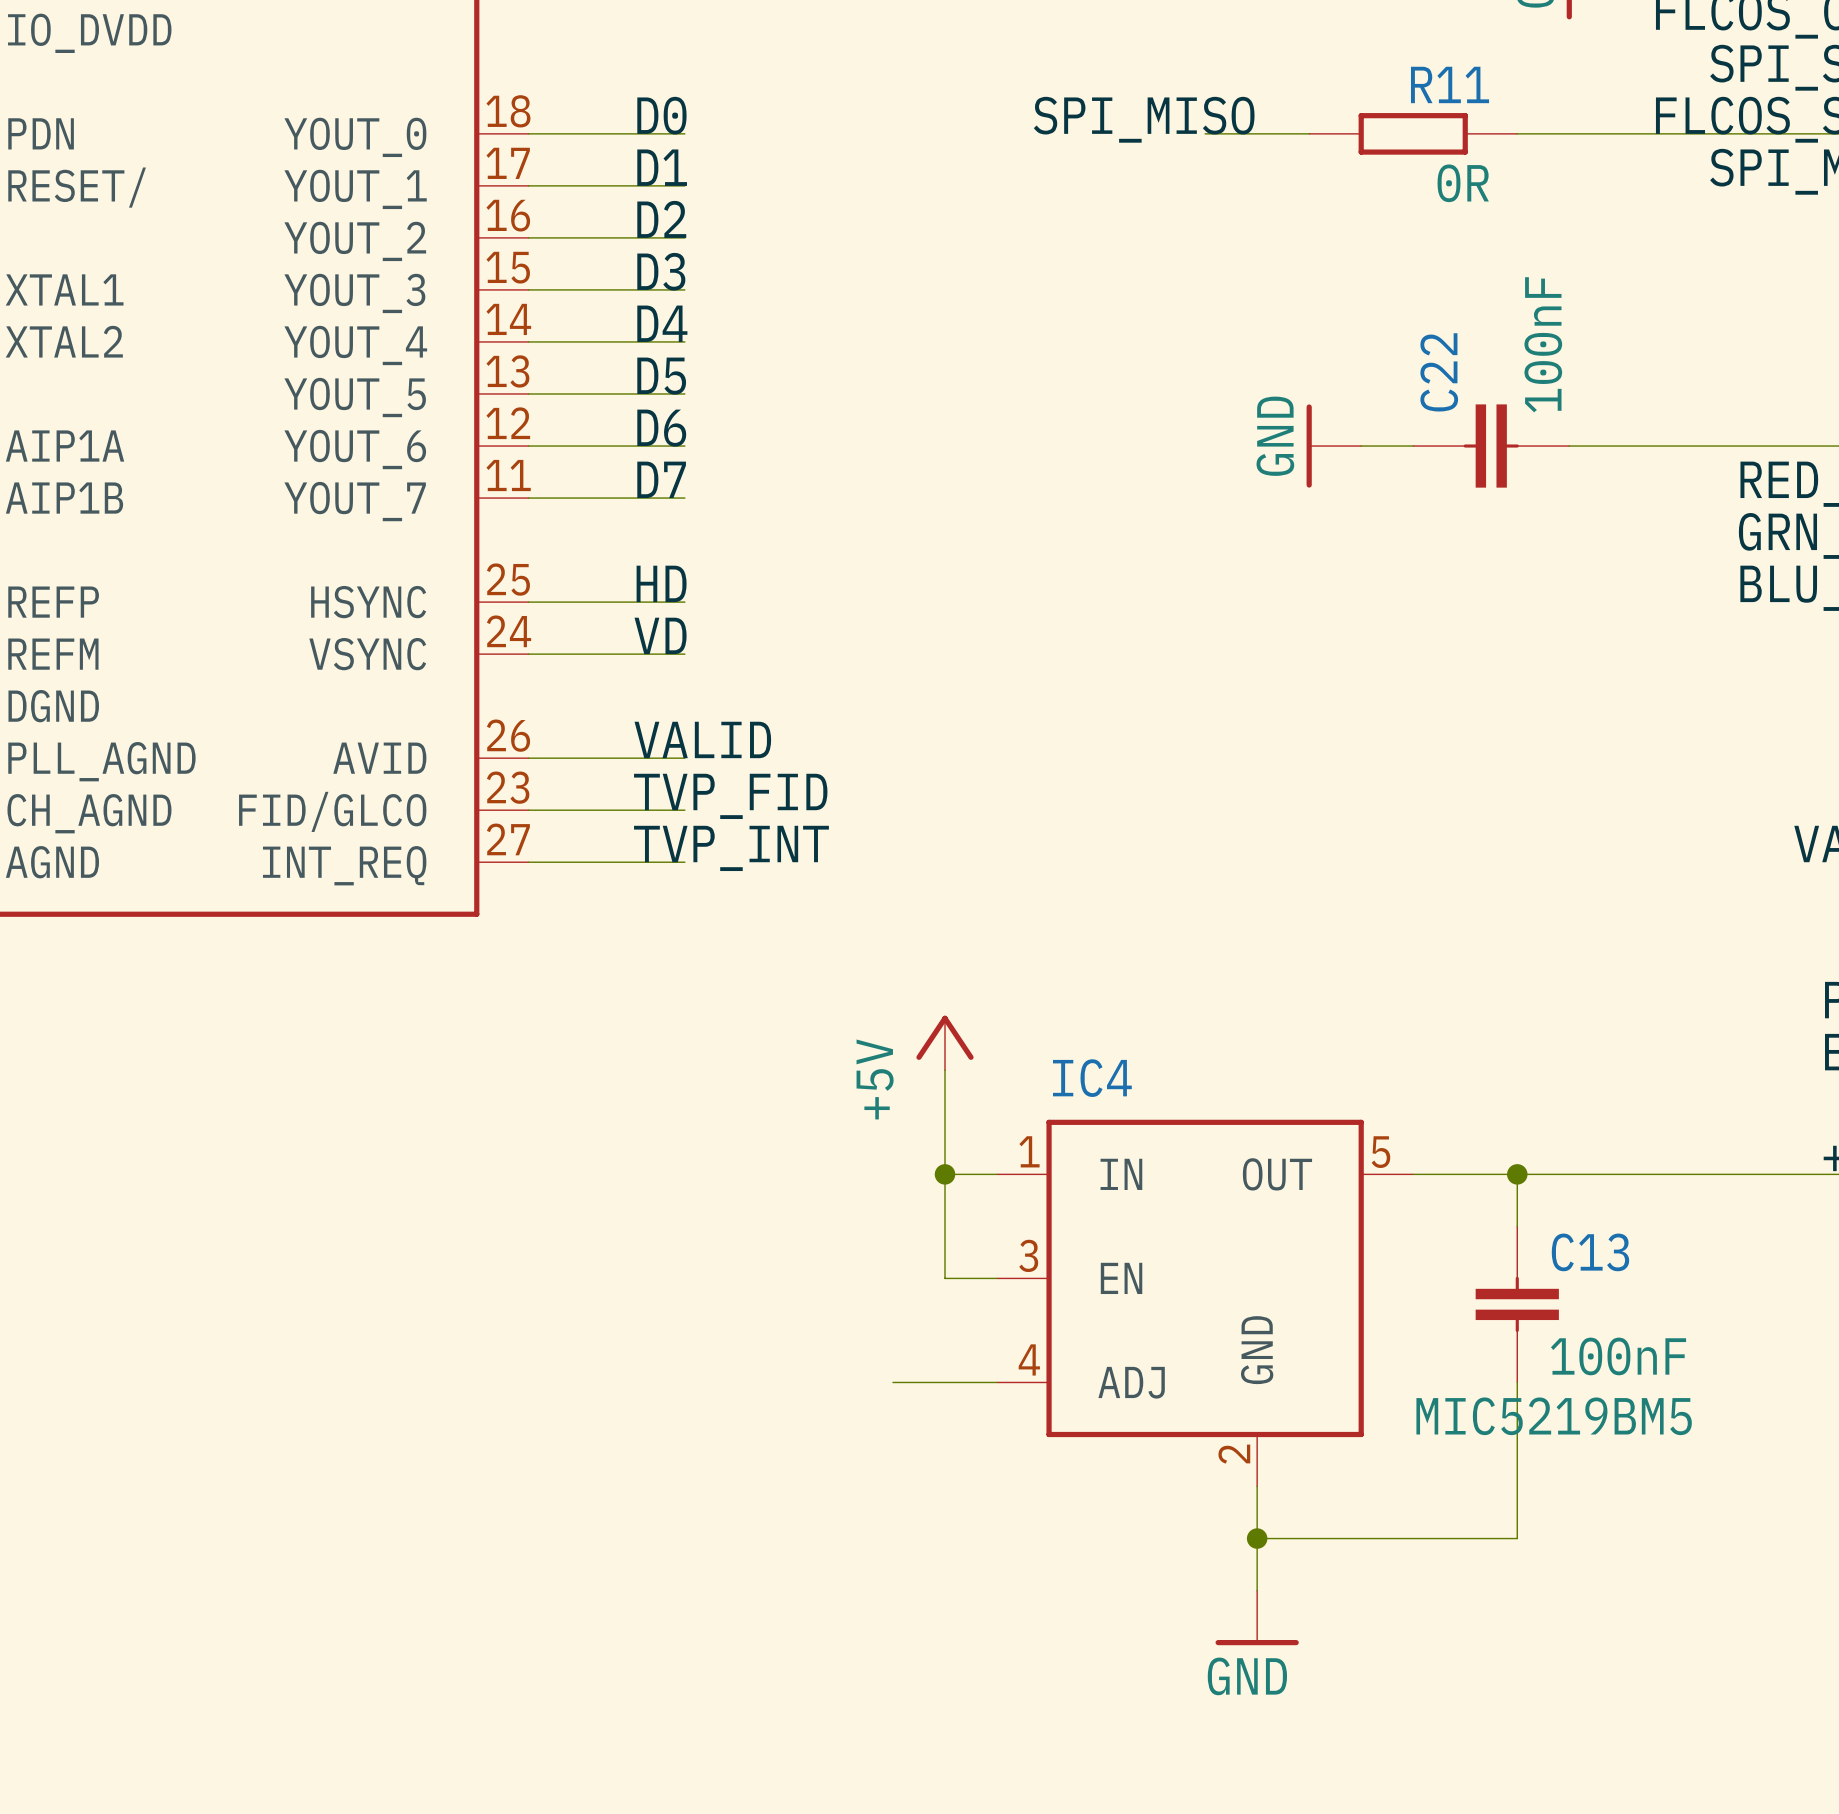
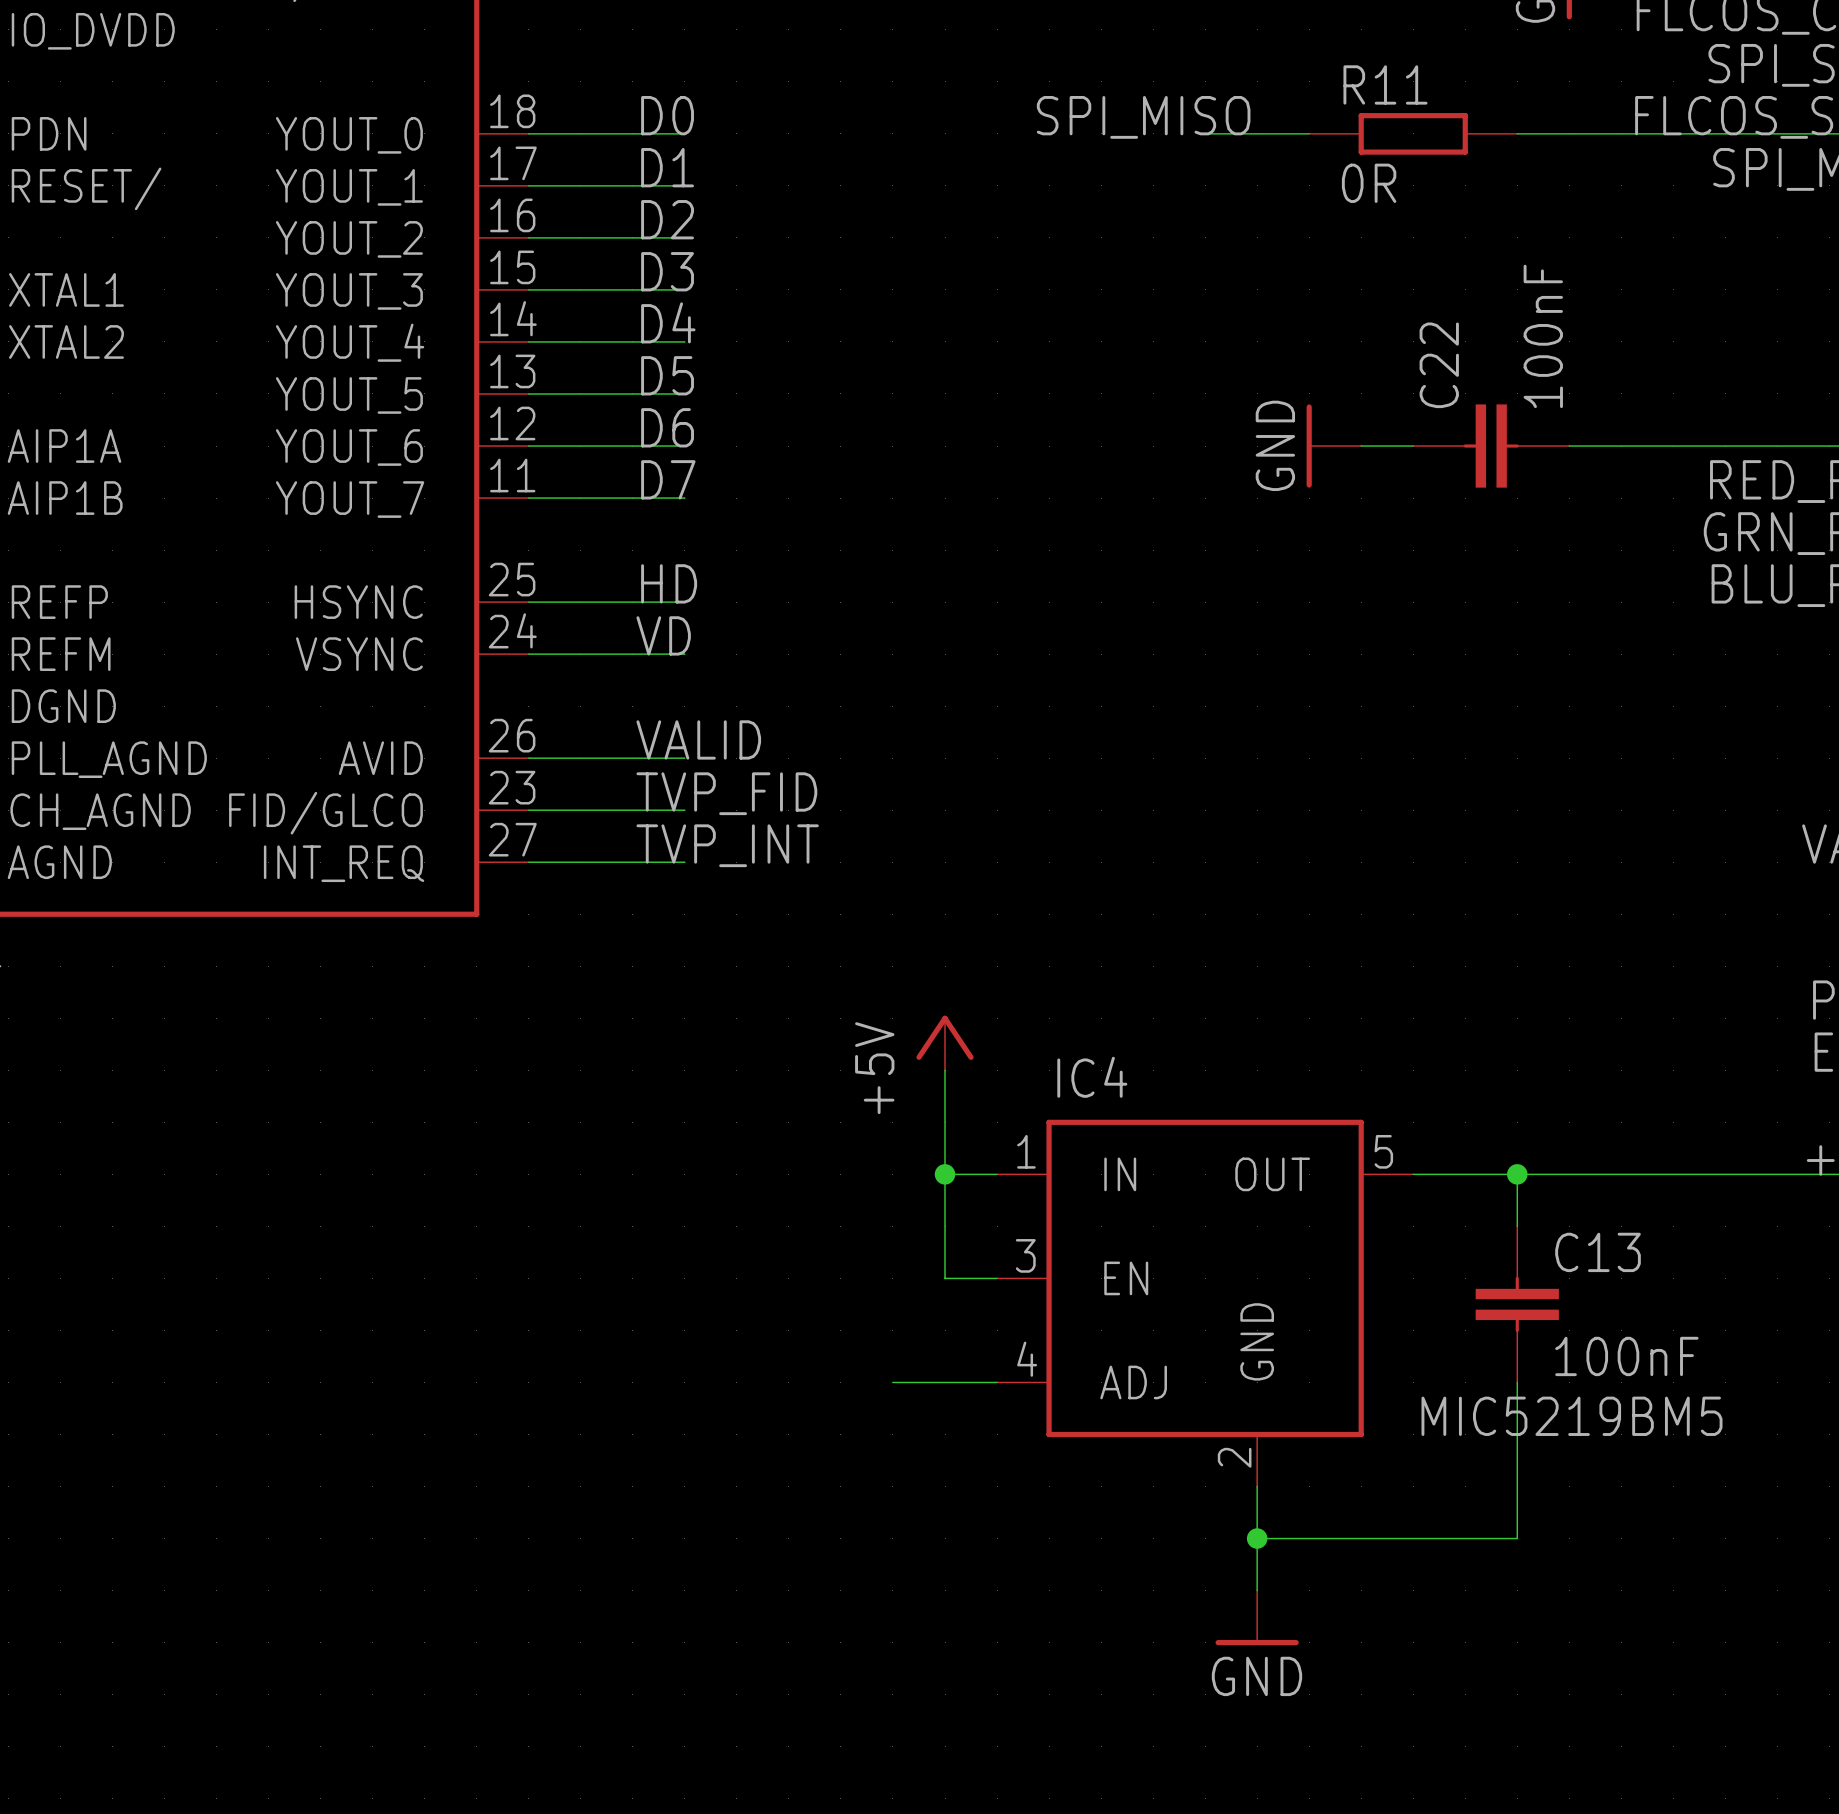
R11 name position: R11 (1450, 84) -> R11 (1385, 84)
R11 value position: 0R (1463, 183) -> 0R (1369, 183)

